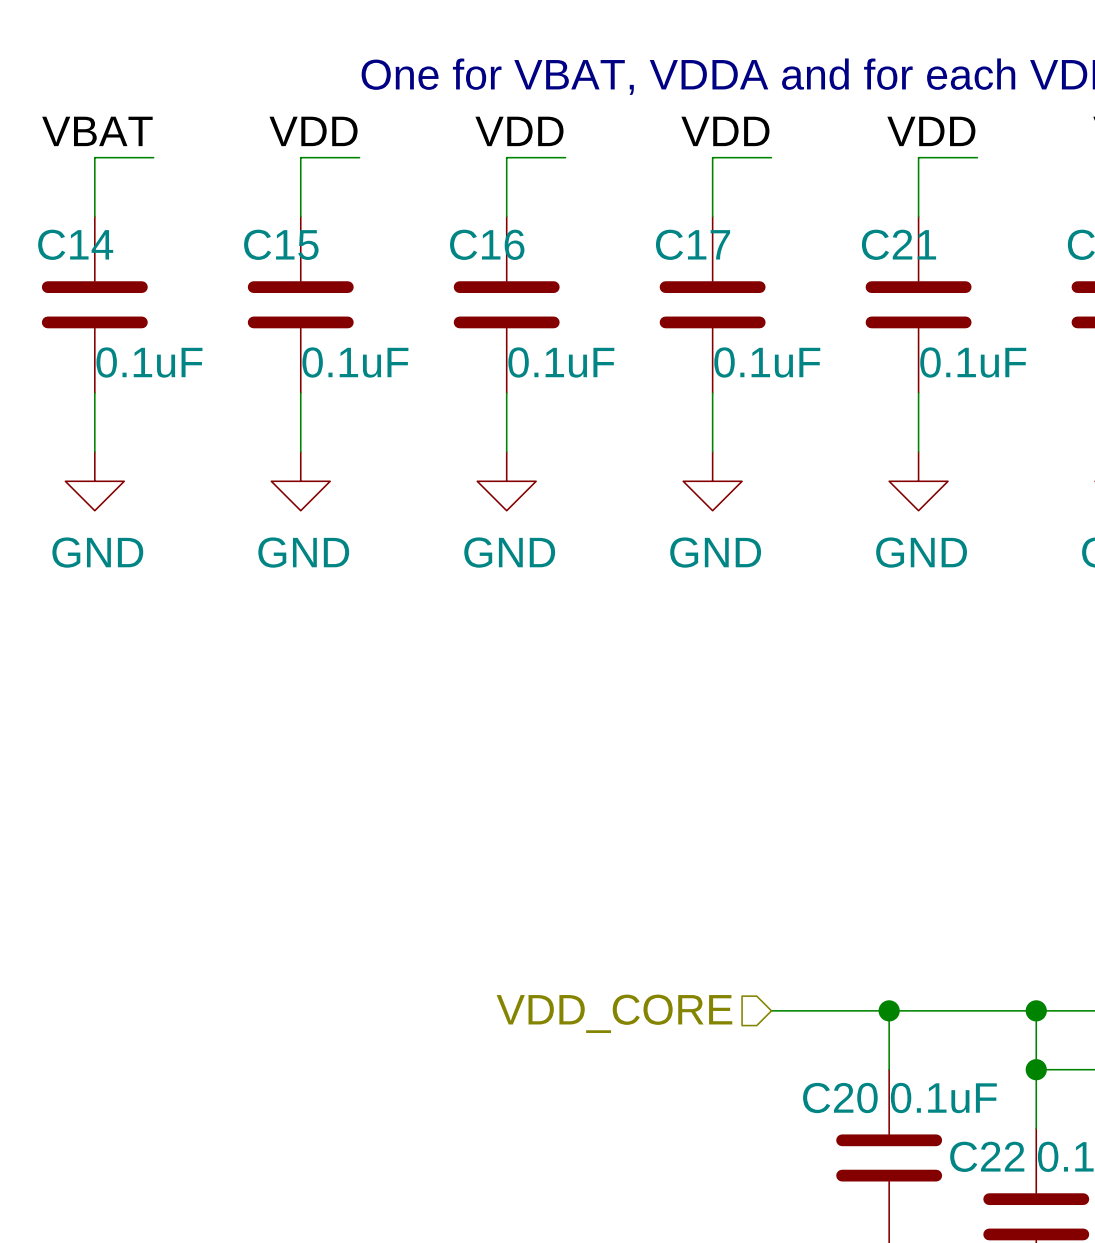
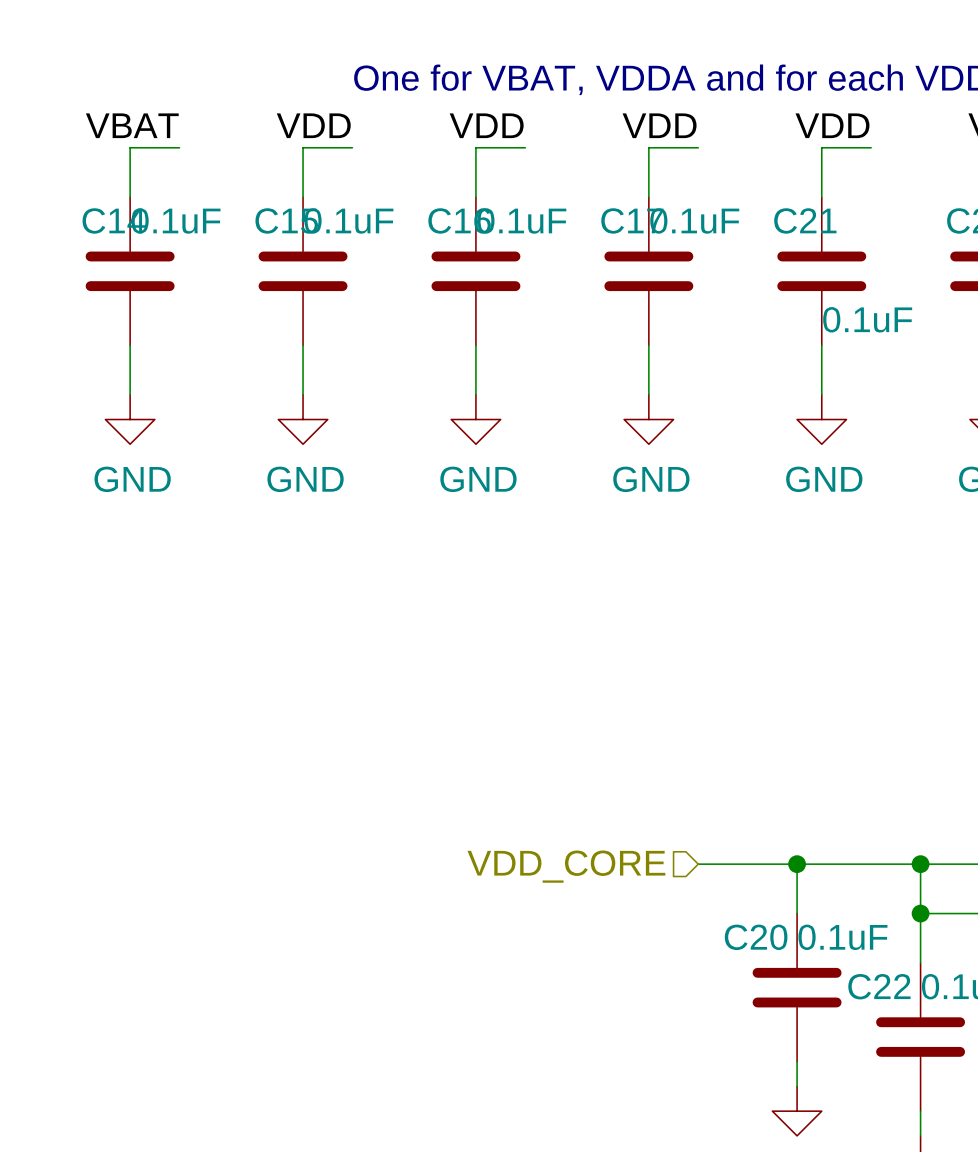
C14 value position: 0.1uF (149, 362) -> 0.1uF (176, 220)
C15 value position: 0.1uF (355, 362) -> 0.1uF (348, 220)
C16 value position: 0.1uF (561, 362) -> 0.1uF (521, 220)
C17 value position: 0.1uF (767, 362) -> 0.1uF (694, 220)

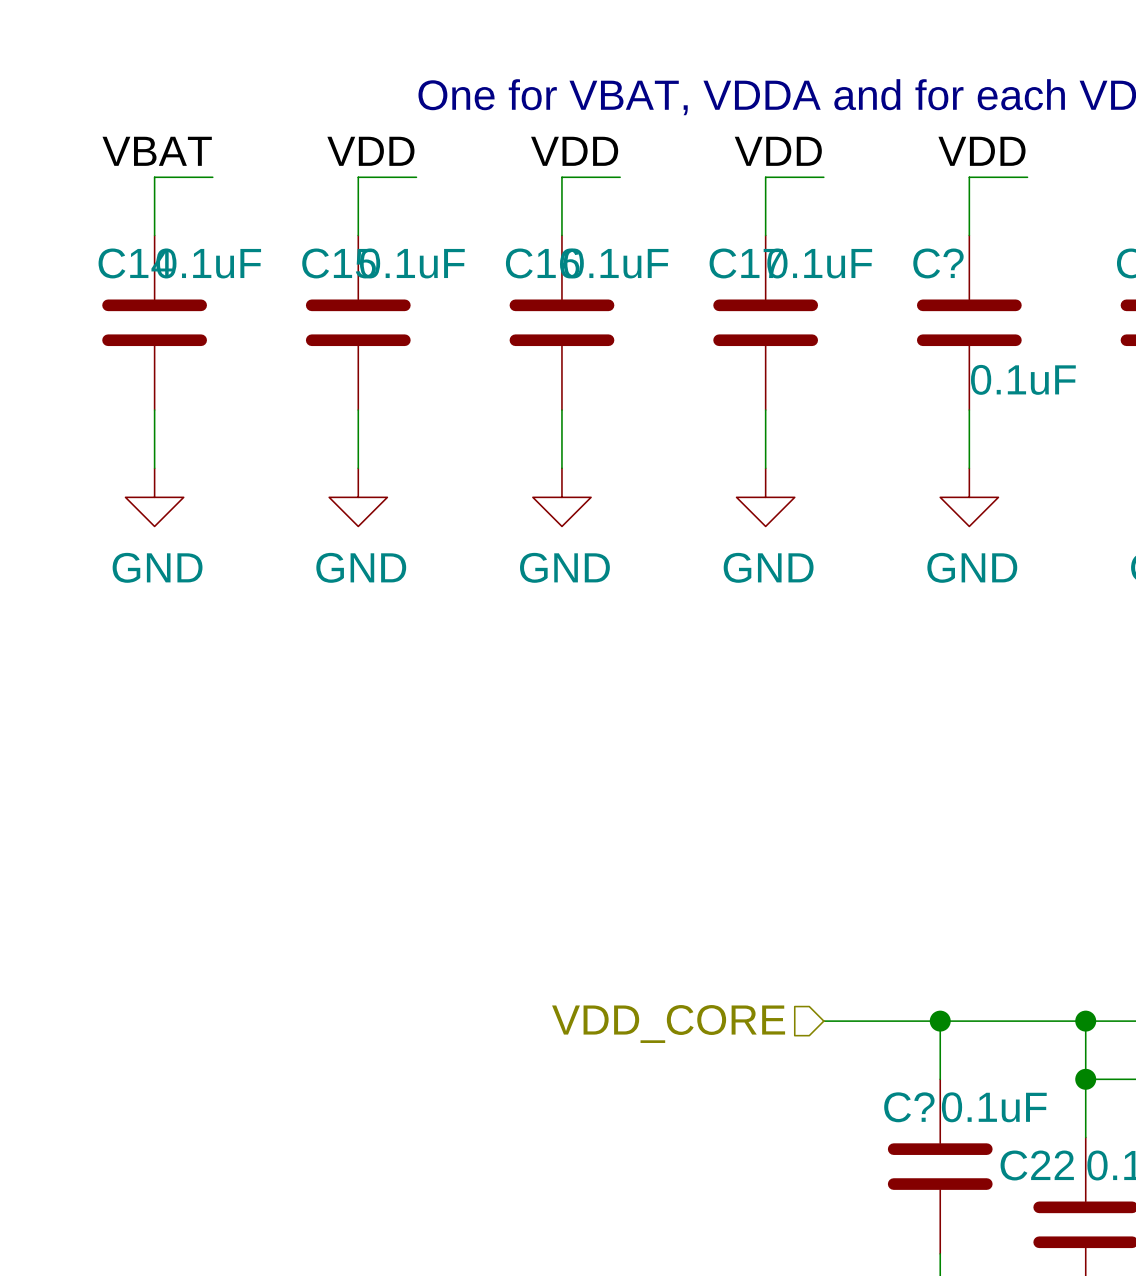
C21 name: C21 (805, 220) -> C? (938, 263)
C20 name: C20 (756, 937) -> C? (909, 1107)

